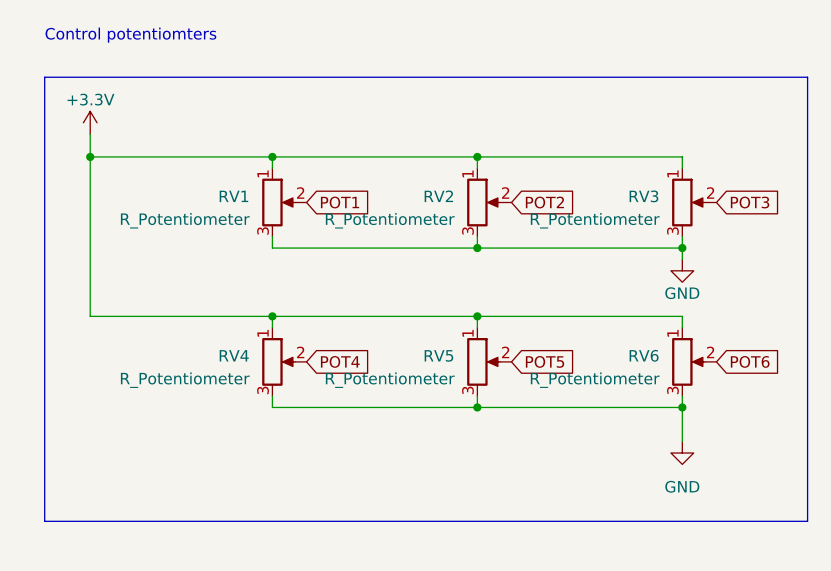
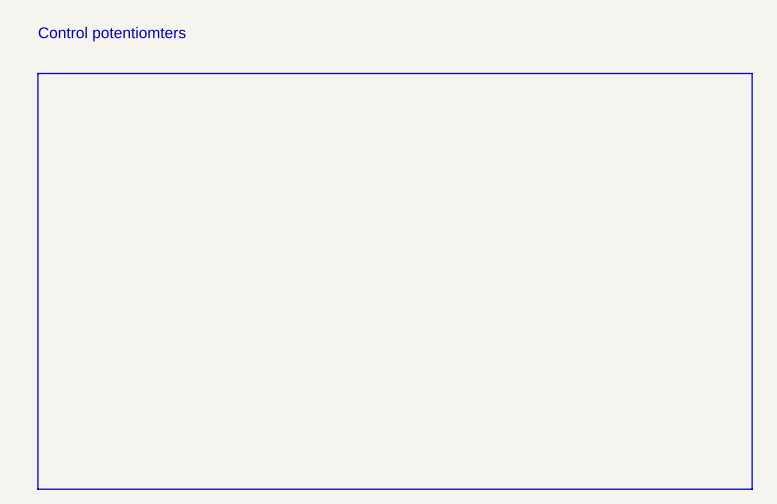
power symbol: +3.3V (90, 122) -> none
wire: (90, 134) (90, 316) (682, 316) (682, 327) -> none
wire: (90, 156) (682, 156) (682, 168) -> none
junction: (90, 156) -> none
wire: (272, 156) (272, 168) -> none
junction: (272, 156) -> none
wire: (477, 156) (477, 168) -> none
junction: (477, 156) -> none
RV1: R_Potentiometer (284, 202) -> none
global label: POT1 (340, 202) -> none
RV2: R_Potentiometer (489, 202) -> none
global label: POT2 (544, 202) -> none
RV3: R_Potentiometer (694, 202) -> none
global label: POT3 (750, 202) -> none
wire: (272, 236) (272, 248) (682, 248) -> none
wire: (477, 236) (477, 248) -> none
wire: (682, 236) (682, 259) -> none
junction: (477, 248) -> none
junction: (682, 248) -> none
power symbol: GND (682, 270) -> none
wire: (272, 316) (272, 327) -> none
junction: (272, 316) -> none
wire: (477, 316) (477, 327) -> none
junction: (477, 316) -> none
RV4: R_Potentiometer (284, 361) -> none
global label: POT4 (340, 361) -> none
RV5: R_Potentiometer (489, 361) -> none
global label: POT5 (545, 361) -> none
RV6: R_Potentiometer (694, 361) -> none
global label: POT6 (750, 361) -> none
wire: (272, 396) (272, 407) (682, 407) -> none
wire: (477, 396) (477, 407) -> none
wire: (682, 396) (682, 441) -> none
junction: (477, 407) -> none
junction: (682, 407) -> none
power symbol: GND (682, 453) -> none

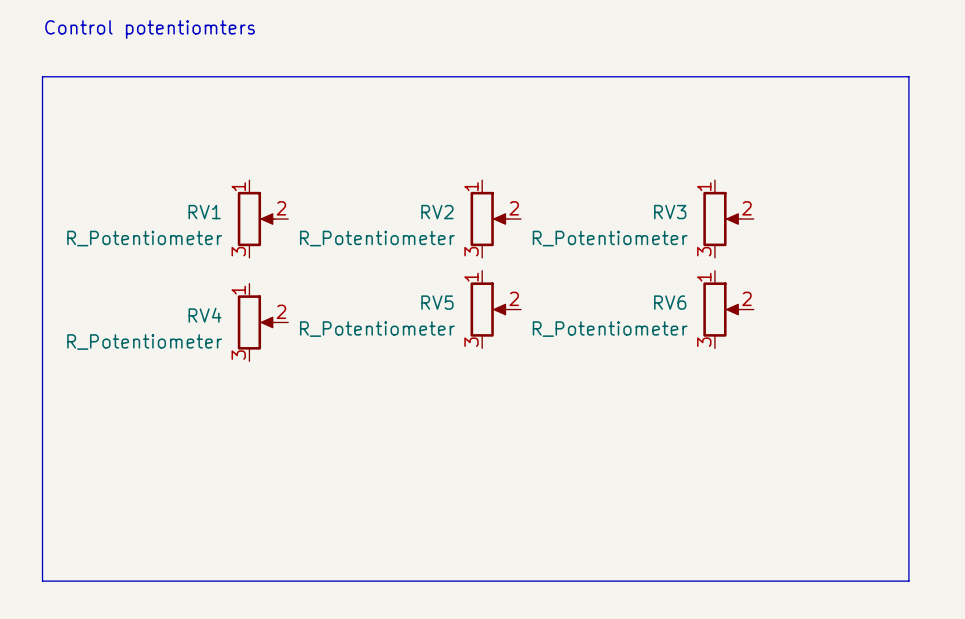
RV1: none -> R_Potentiometer (262, 219)
RV2: none -> R_Potentiometer (495, 219)
RV3: none -> R_Potentiometer (728, 219)
RV5: none -> R_Potentiometer (495, 309)
RV6: none -> R_Potentiometer (728, 309)
RV4: none -> R_Potentiometer (262, 322)

